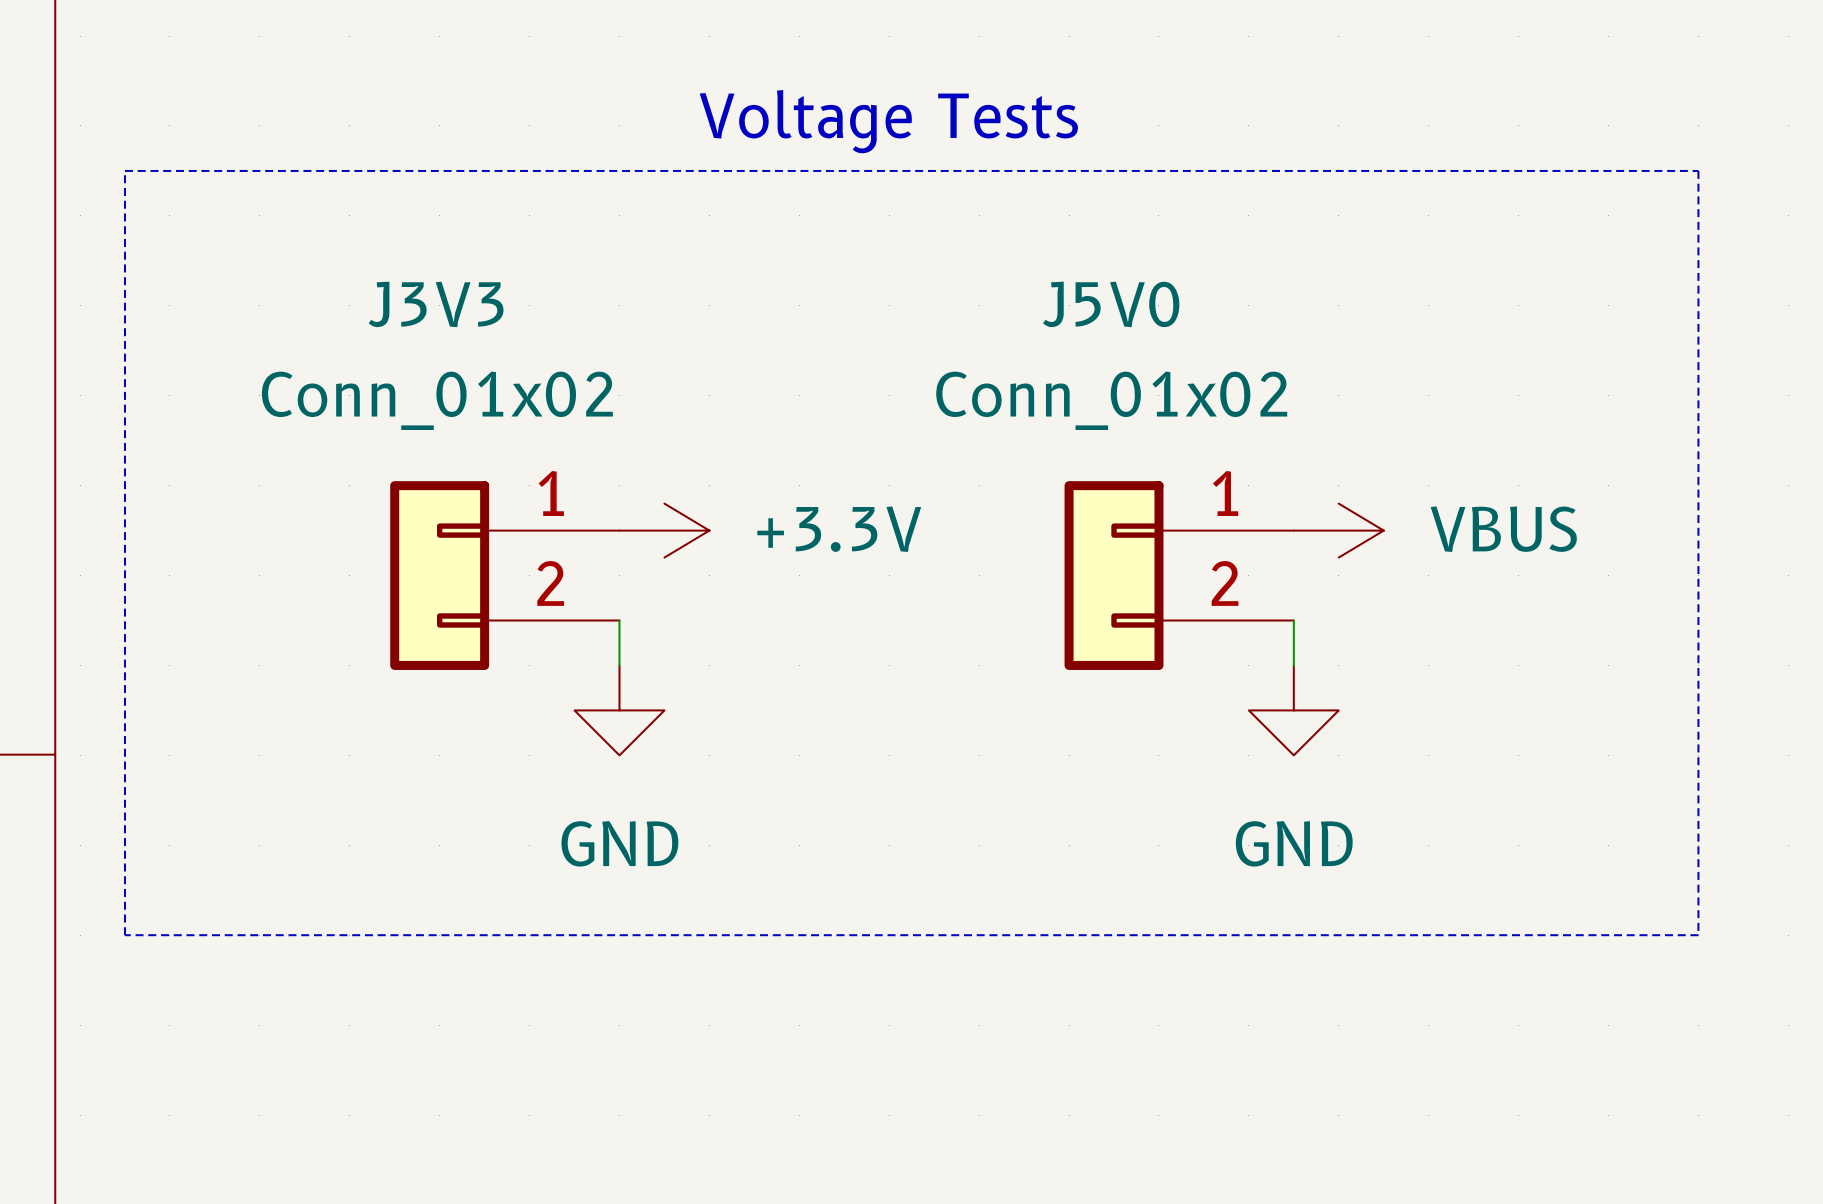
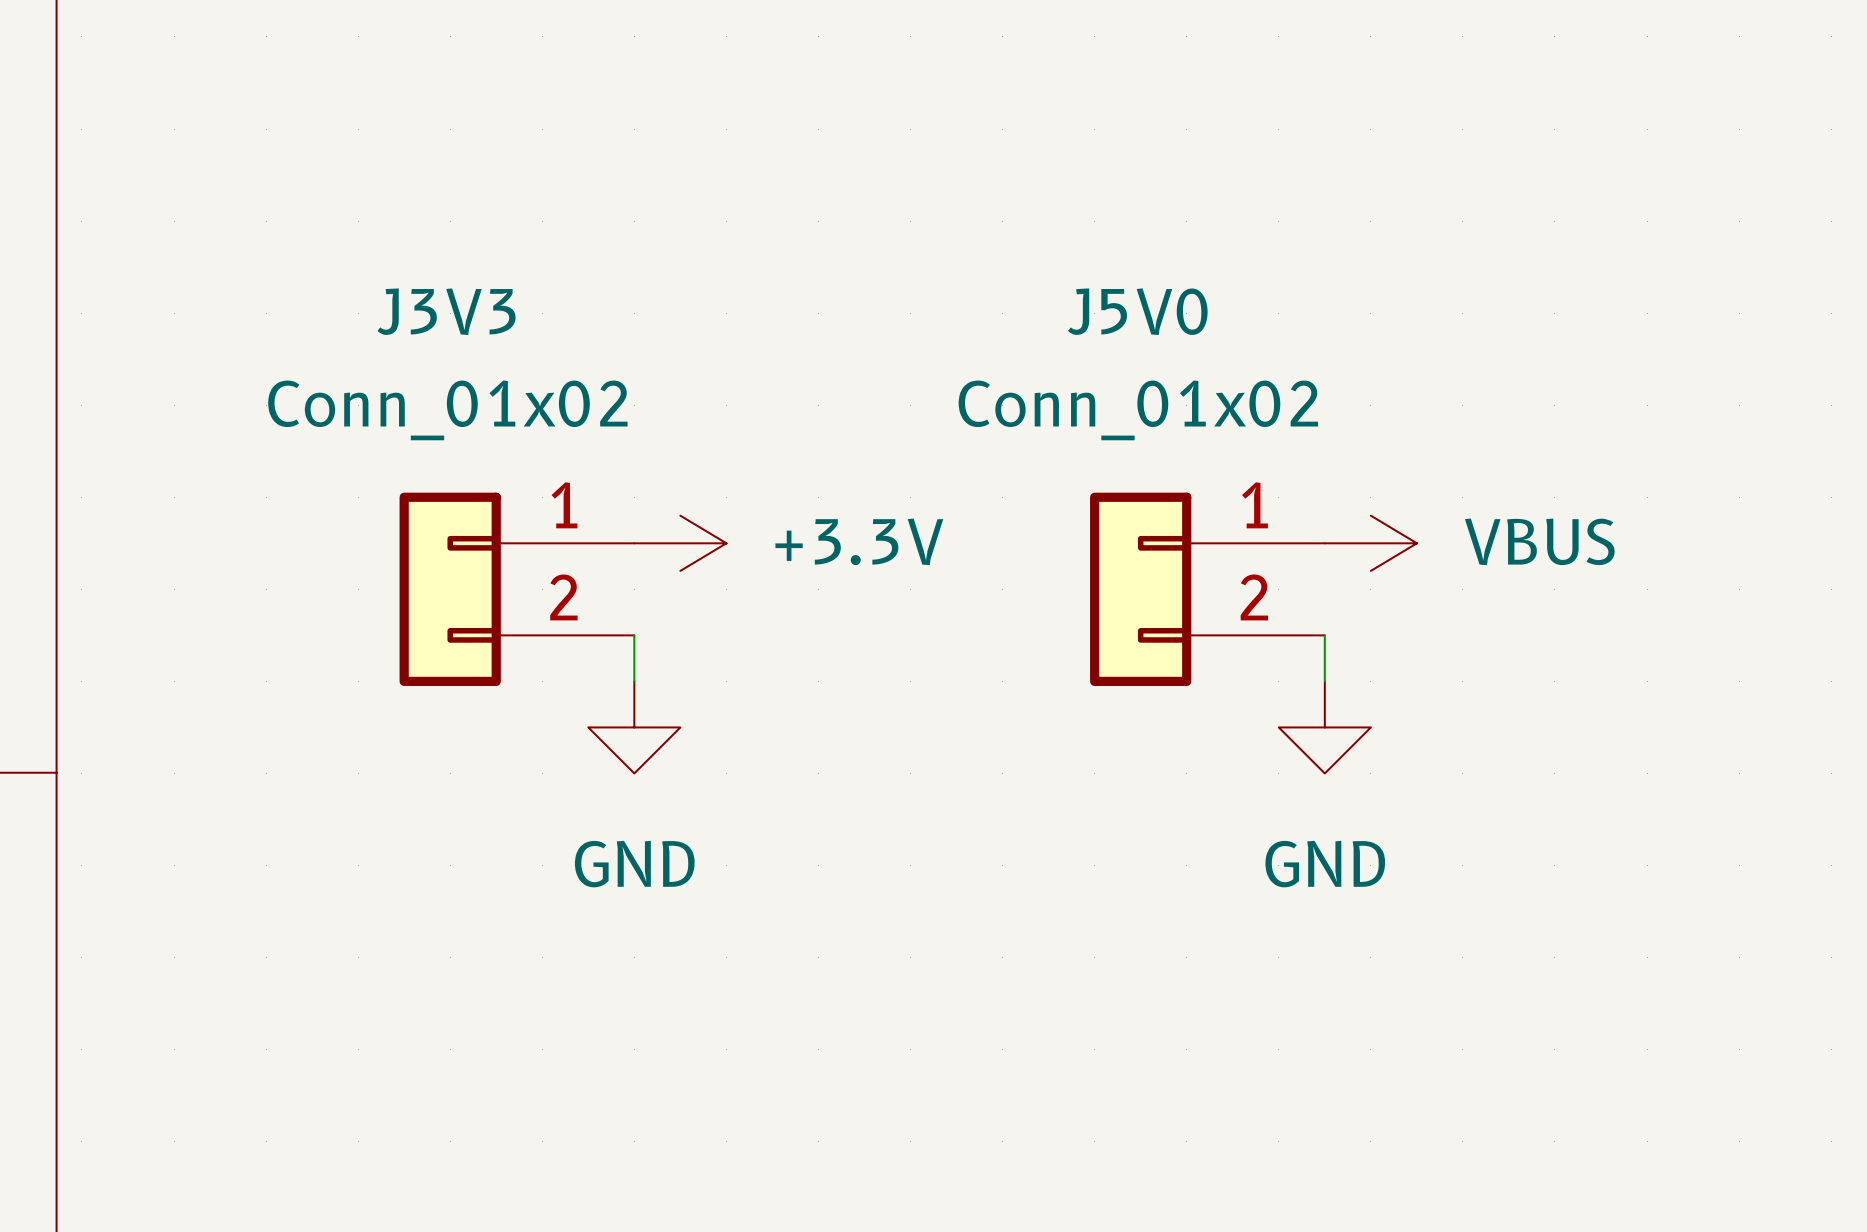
text: Voltage Tests (888, 121) -> none
line: (124, 170) (1698, 170) (1698, 935) (124, 935) (124, 170) -> none

